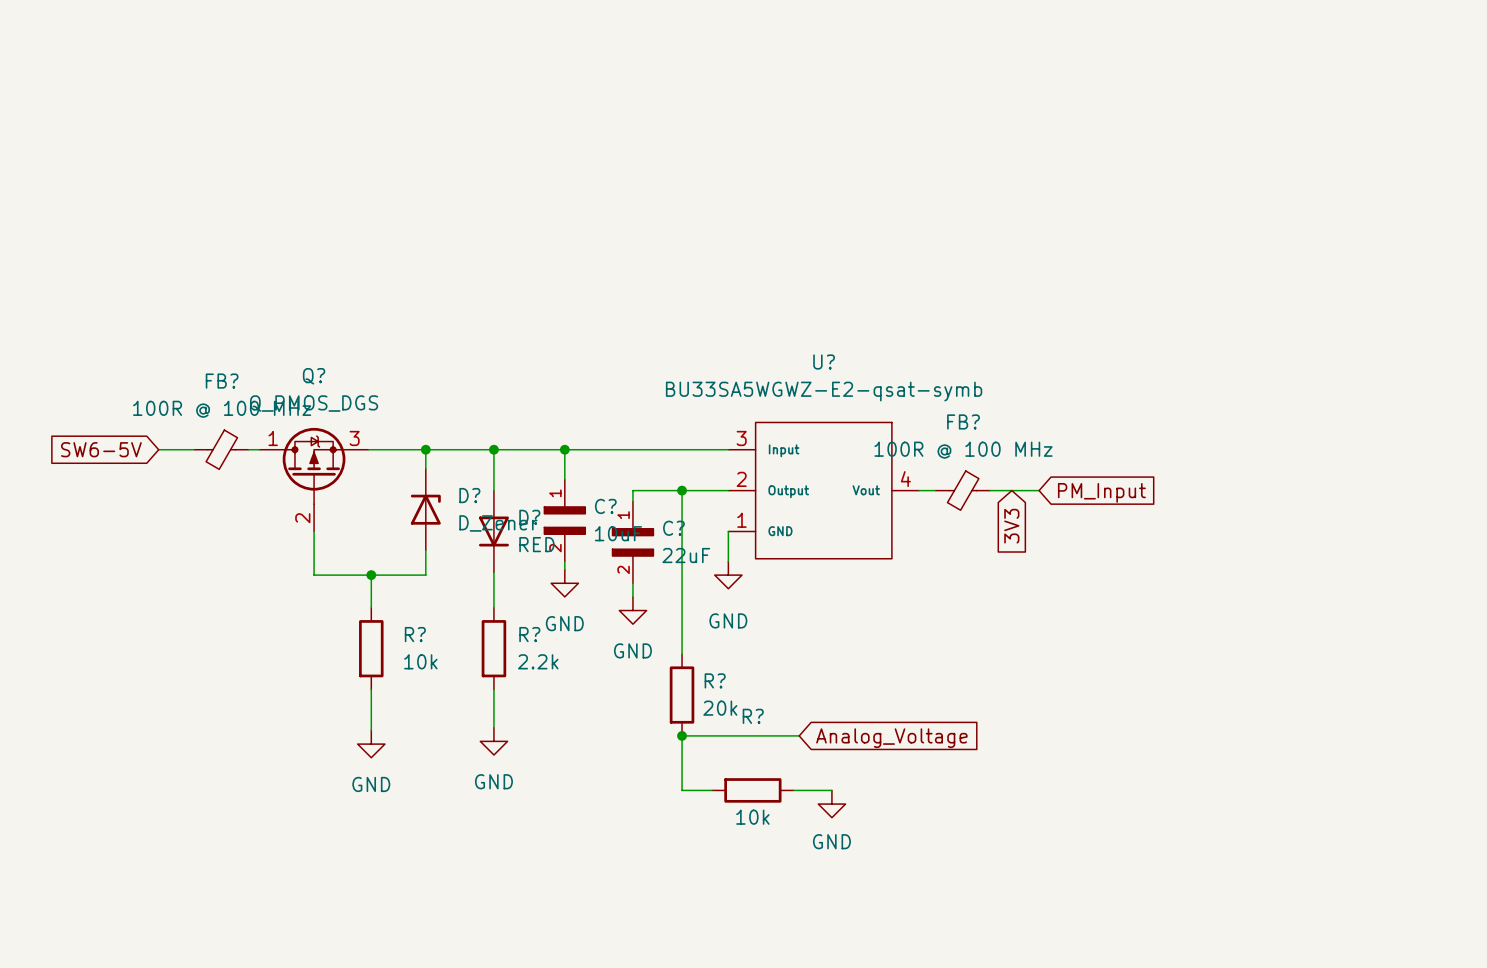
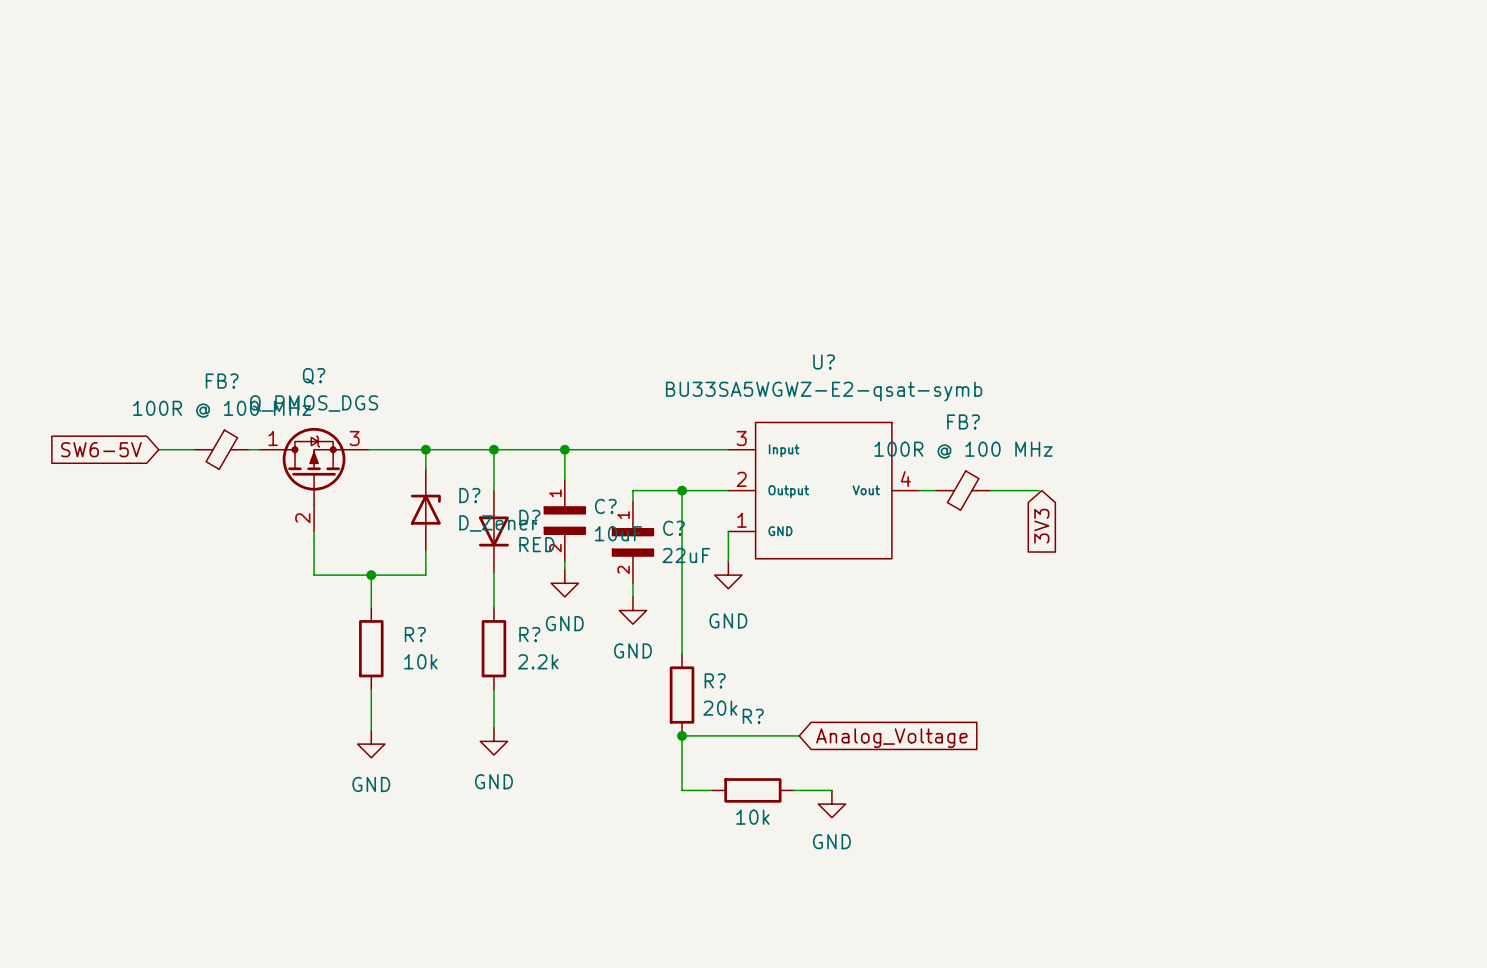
global label: PM_Input (1101, 492) -> 3V3 (1041, 526)
global label: 3V3 (1011, 526) -> none

